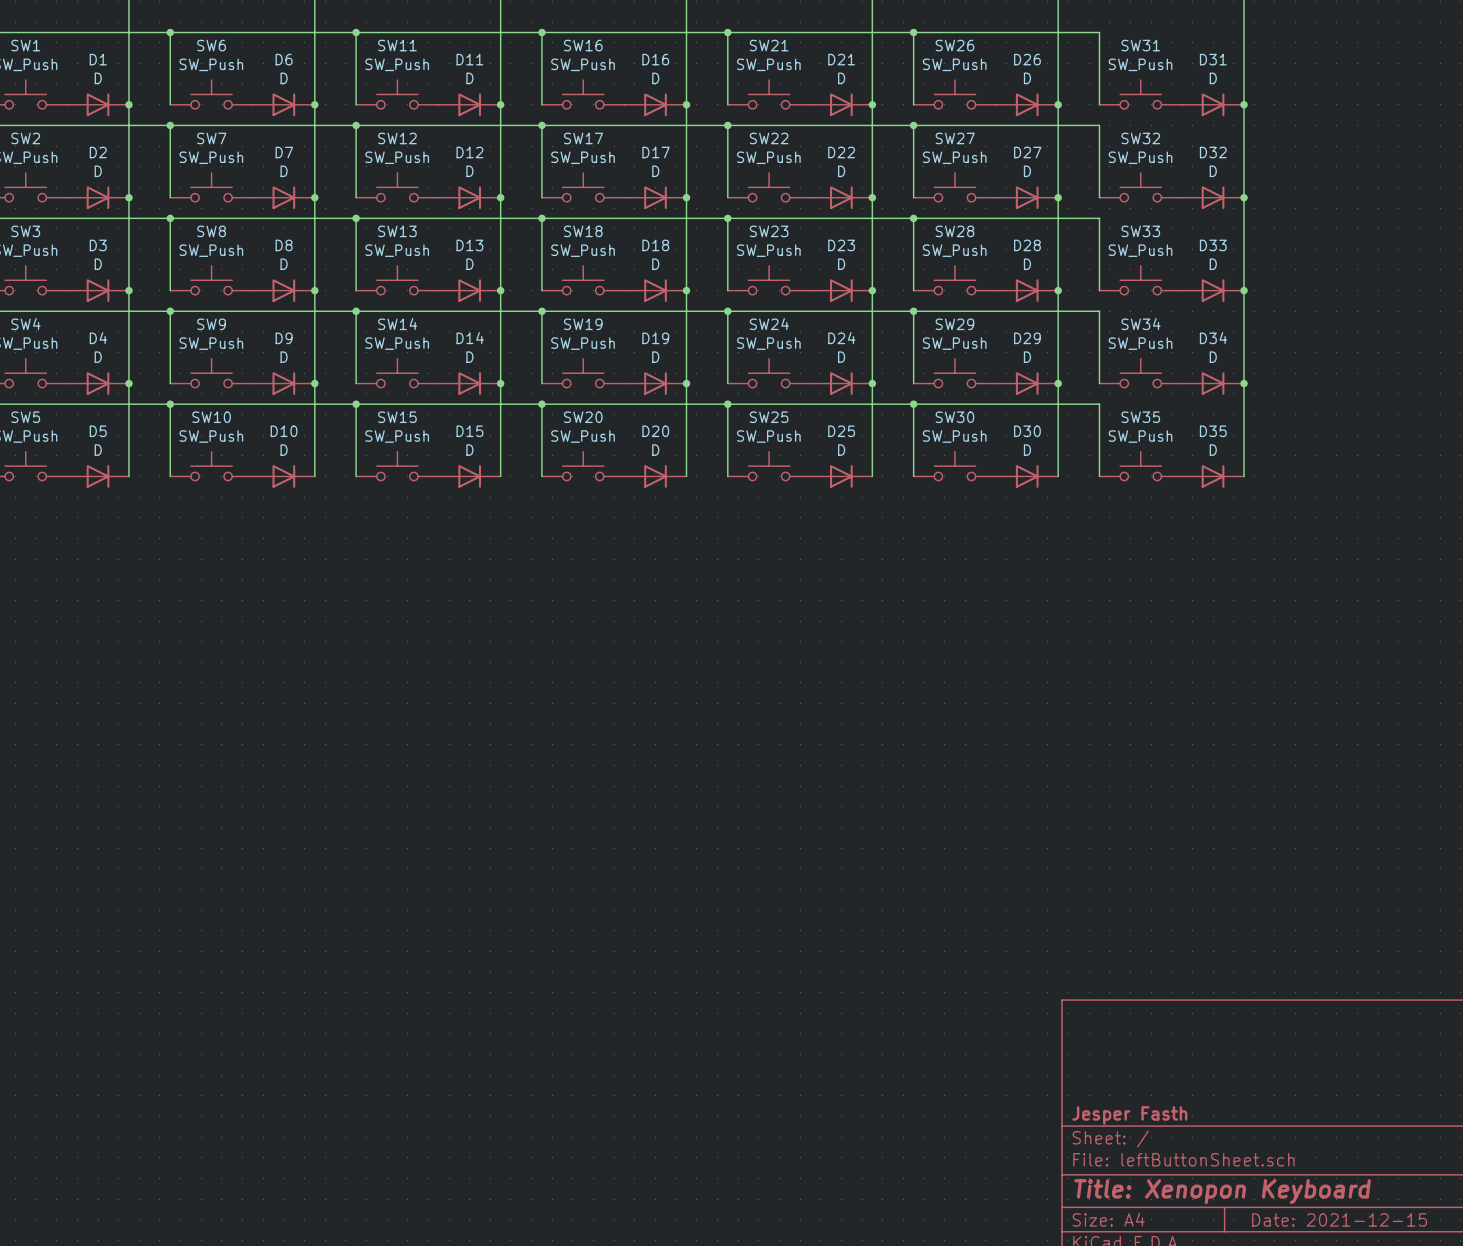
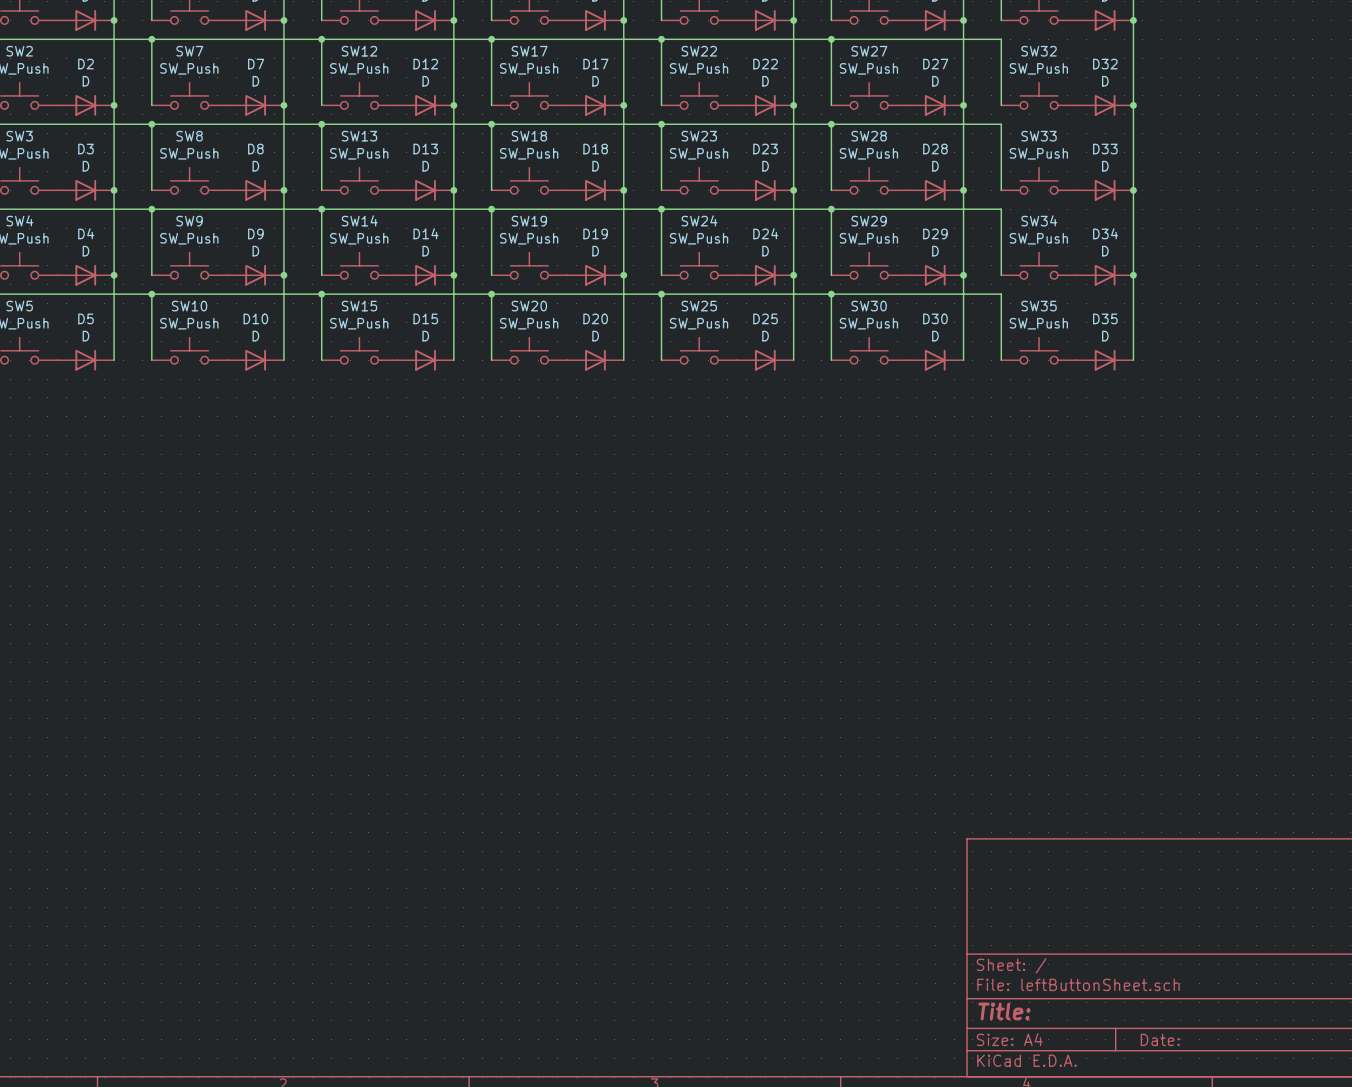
title block: Jesper Fasth (1129, 1115) -> none
title block: Title: Xenopon Keyboard (1222, 1191) -> Title: (1004, 1011)
title block: Date: 2021-12-15 (1339, 1219) -> Date: (1160, 1039)

